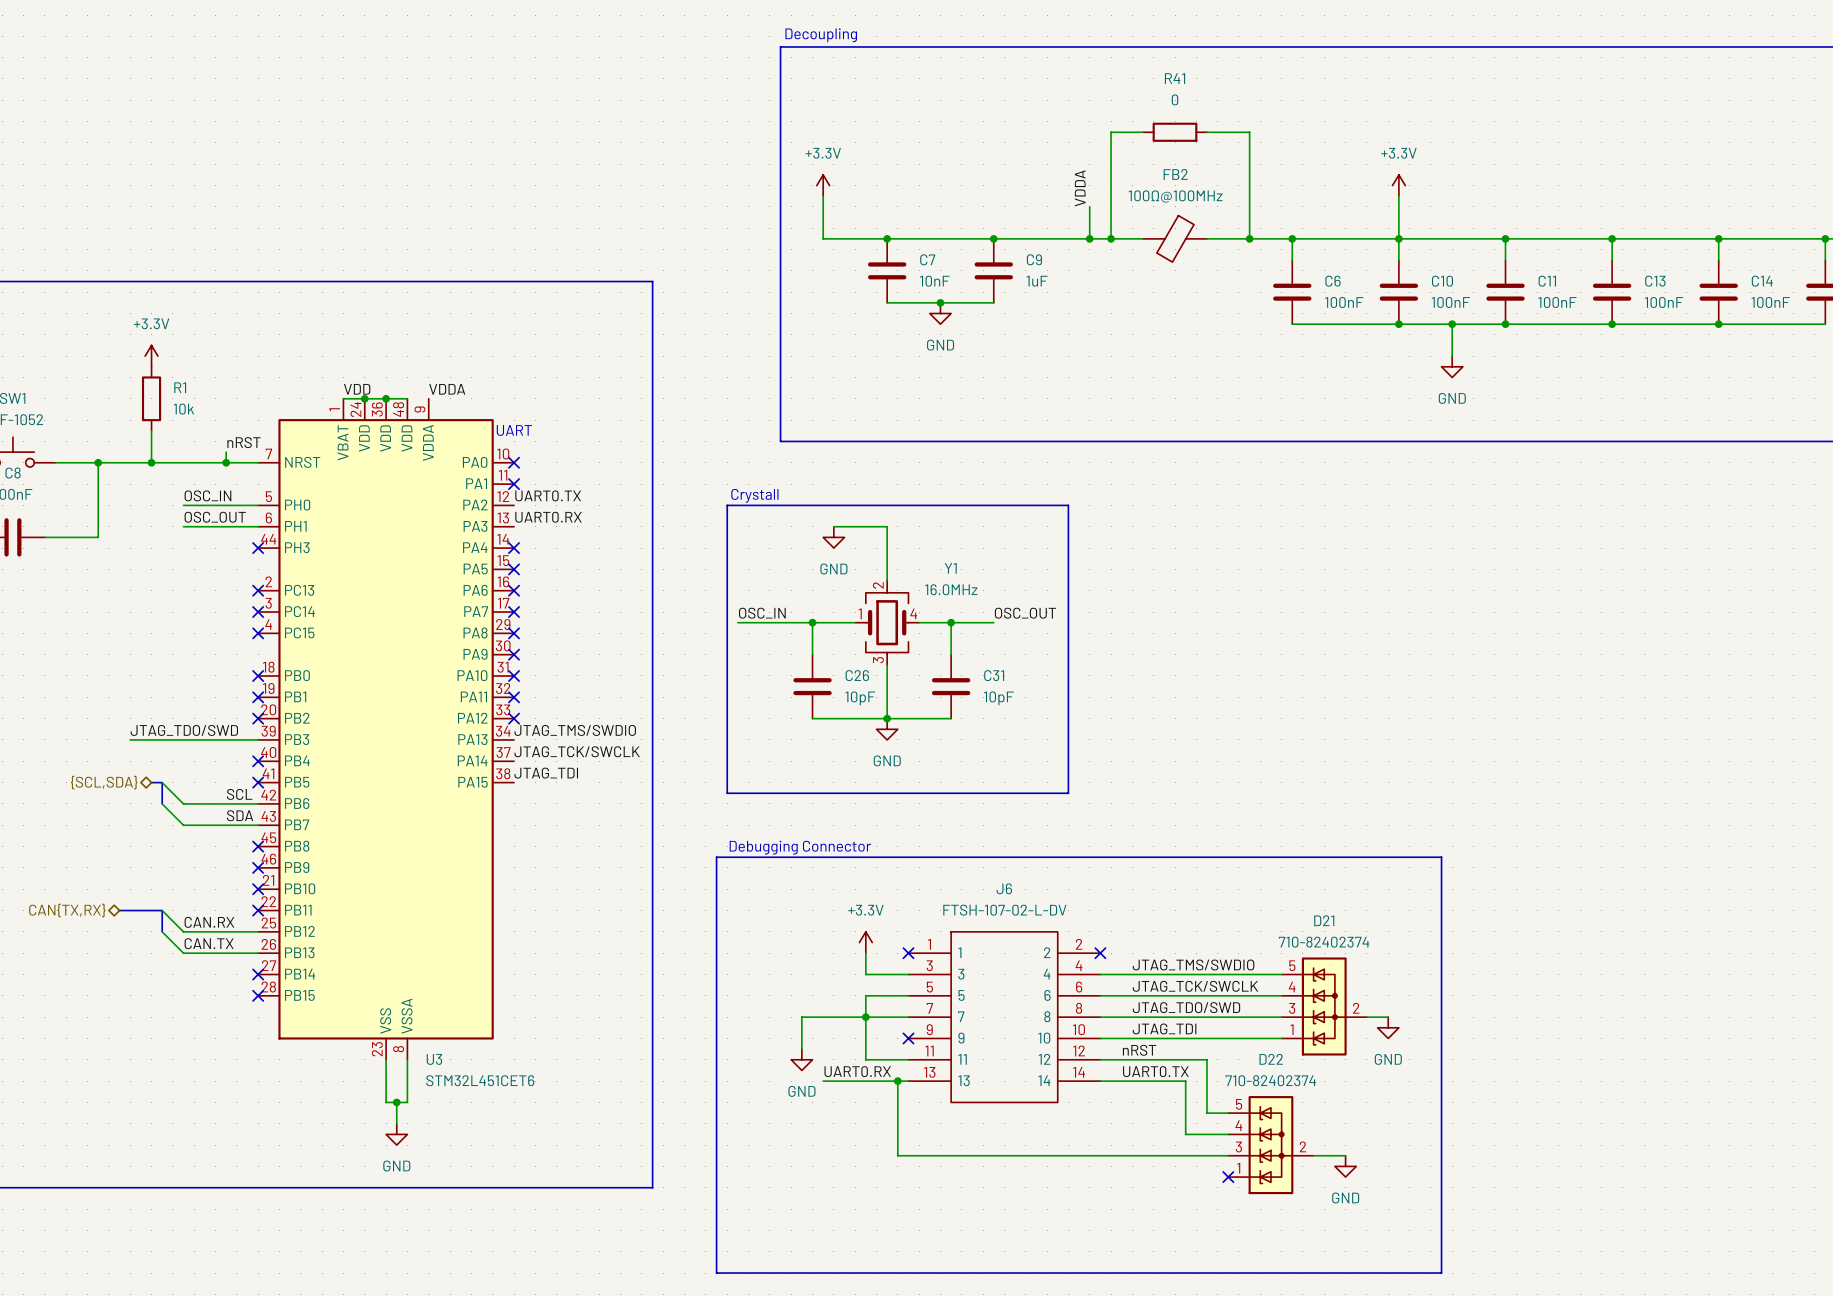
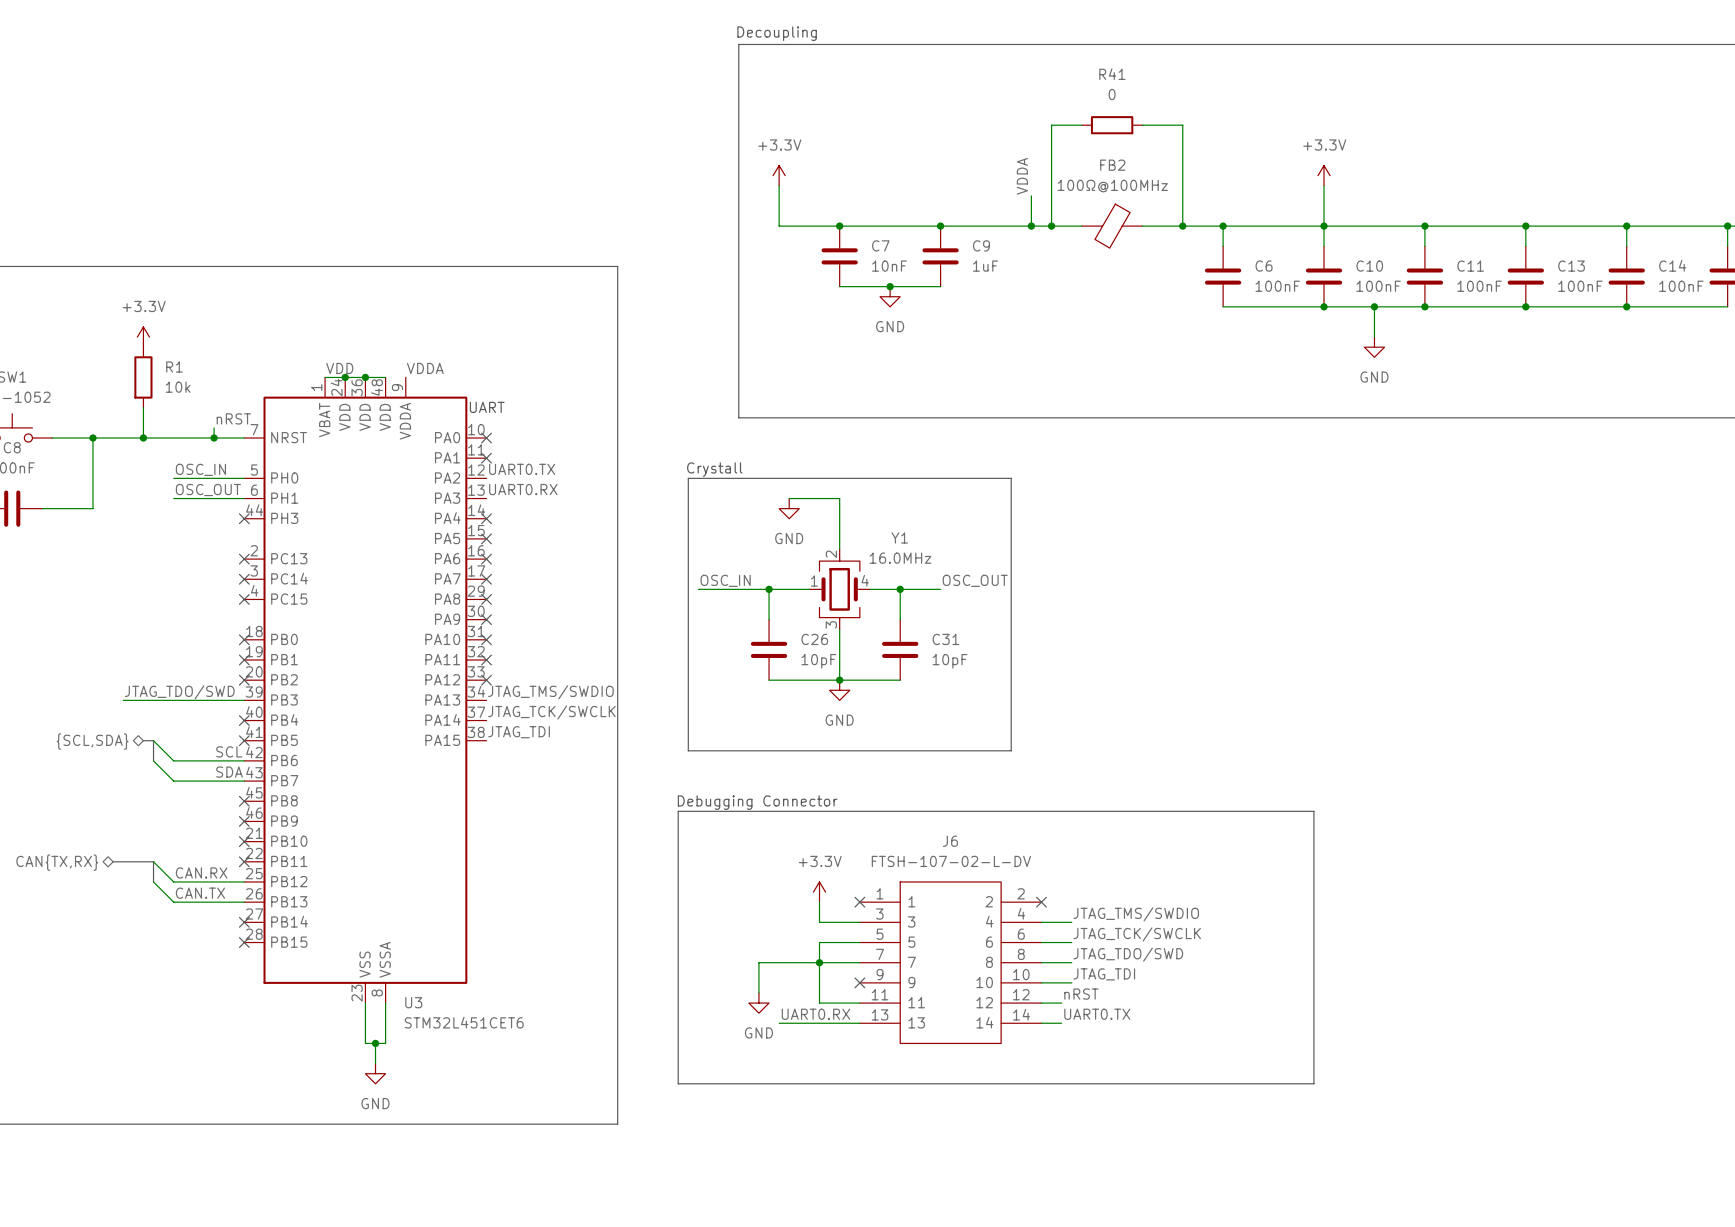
line: (1388, 857) (1441, 857) (1441, 1273) (716, 1273) (716, 1145) -> (1313, 811) (1313, 1083) (678, 1083)
wire: (1132, 974) (1281, 974) -> none
wire: (1132, 995) (1281, 995) -> none
D21: 710-82402374 (1324, 1006) -> none
wire: (1132, 1017) (1281, 1017) -> none
wire: (1366, 1017) (1388, 1017) -> none
power symbol: GND (1388, 1027) -> none
wire: (1132, 1038) (1281, 1038) -> none
wire: (1121, 1059) (1206, 1059) (1206, 1113) (1228, 1113) -> none
wire: (897, 1081) (897, 1155) (1228, 1155) -> none
junction: (897, 1081) -> none
wire: (1121, 1081) (1185, 1081) (1185, 1134) (1228, 1134) -> none
D22: 710-82402374 (1270, 1145) -> none
wire: (1313, 1155) (1345, 1155) -> none
power symbol: GND (1345, 1166) -> none
no-connect mark: (1228, 1177) -> none

